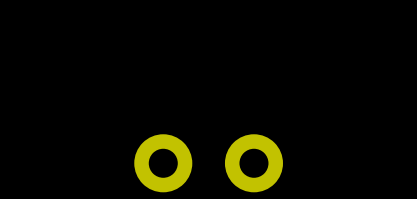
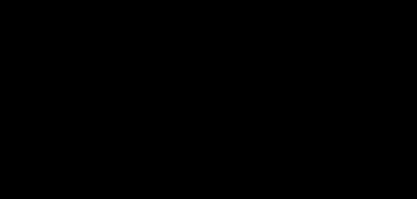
part: (208, 163) -> none

